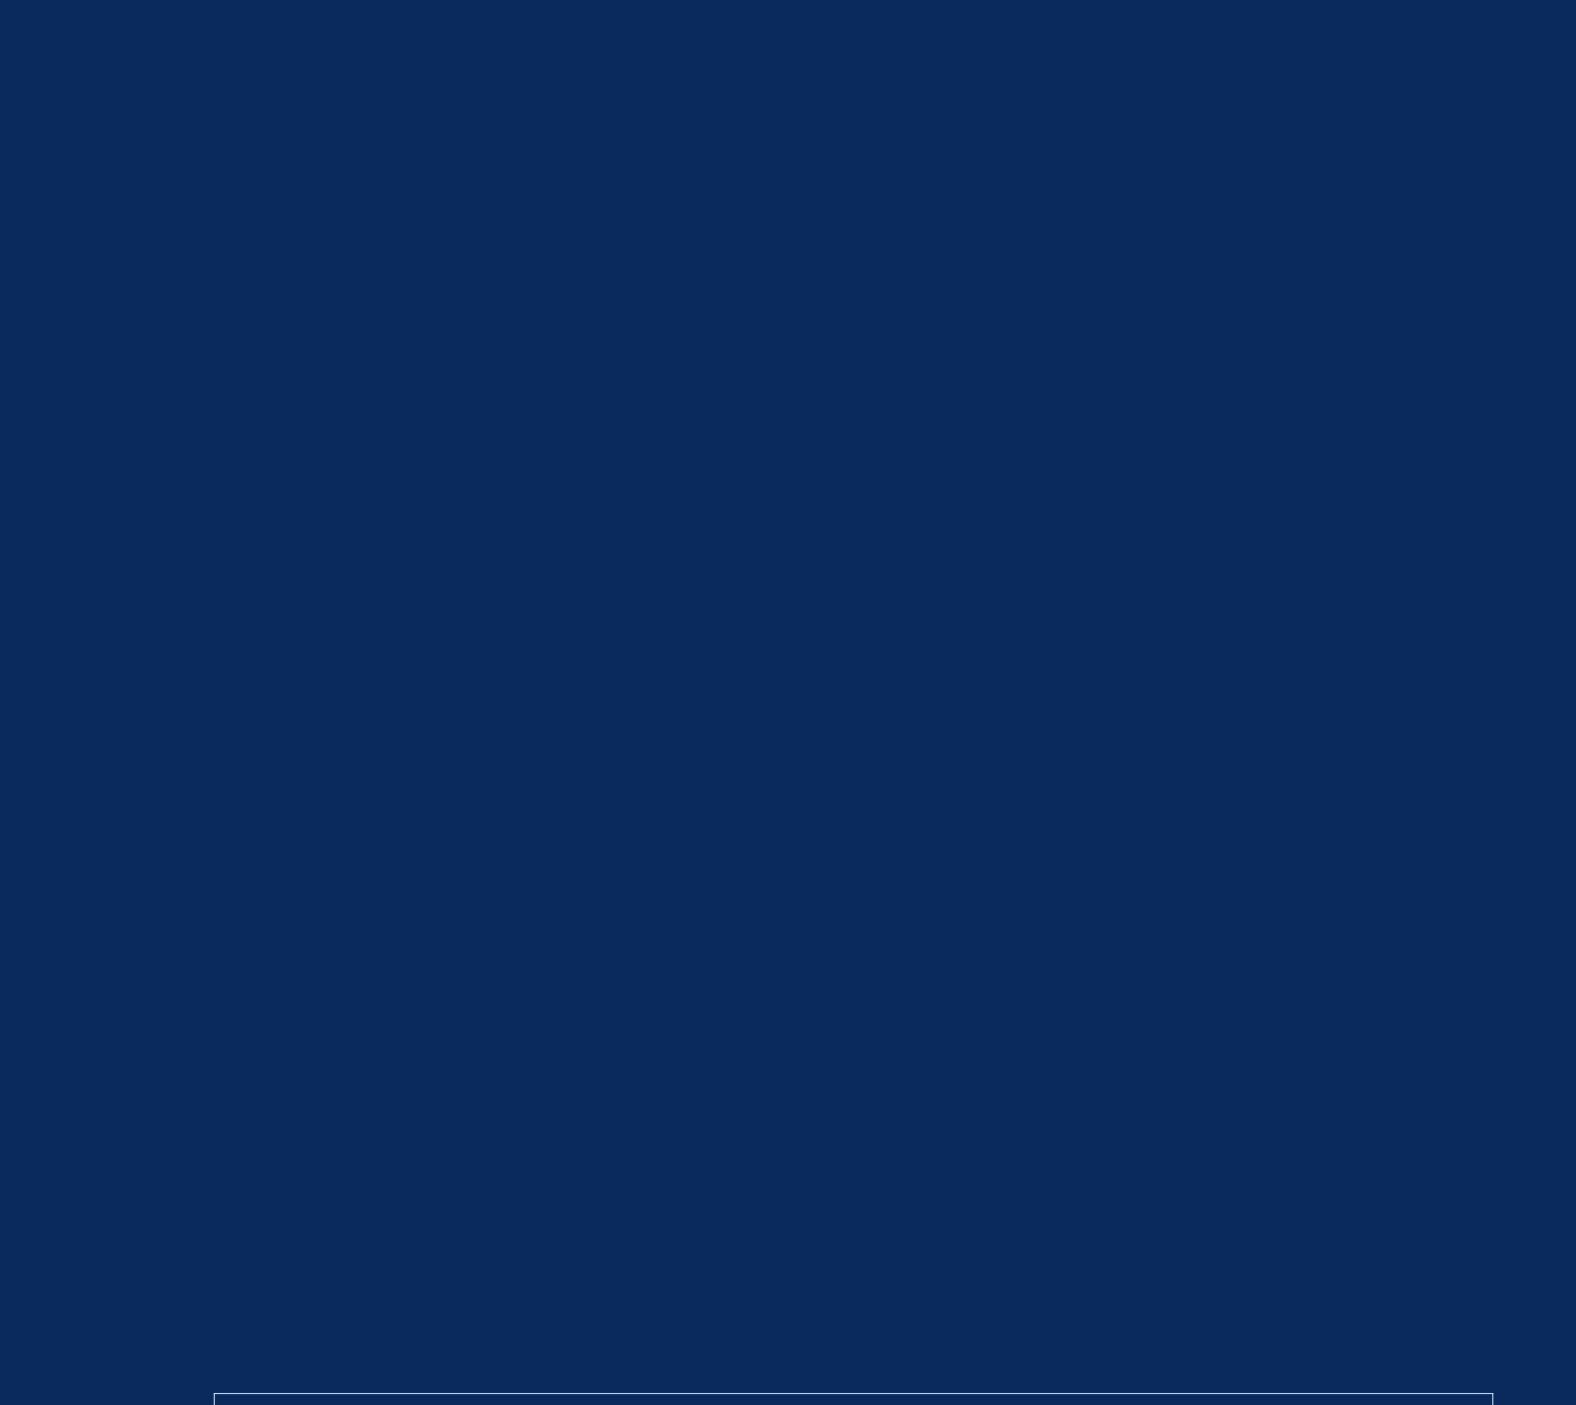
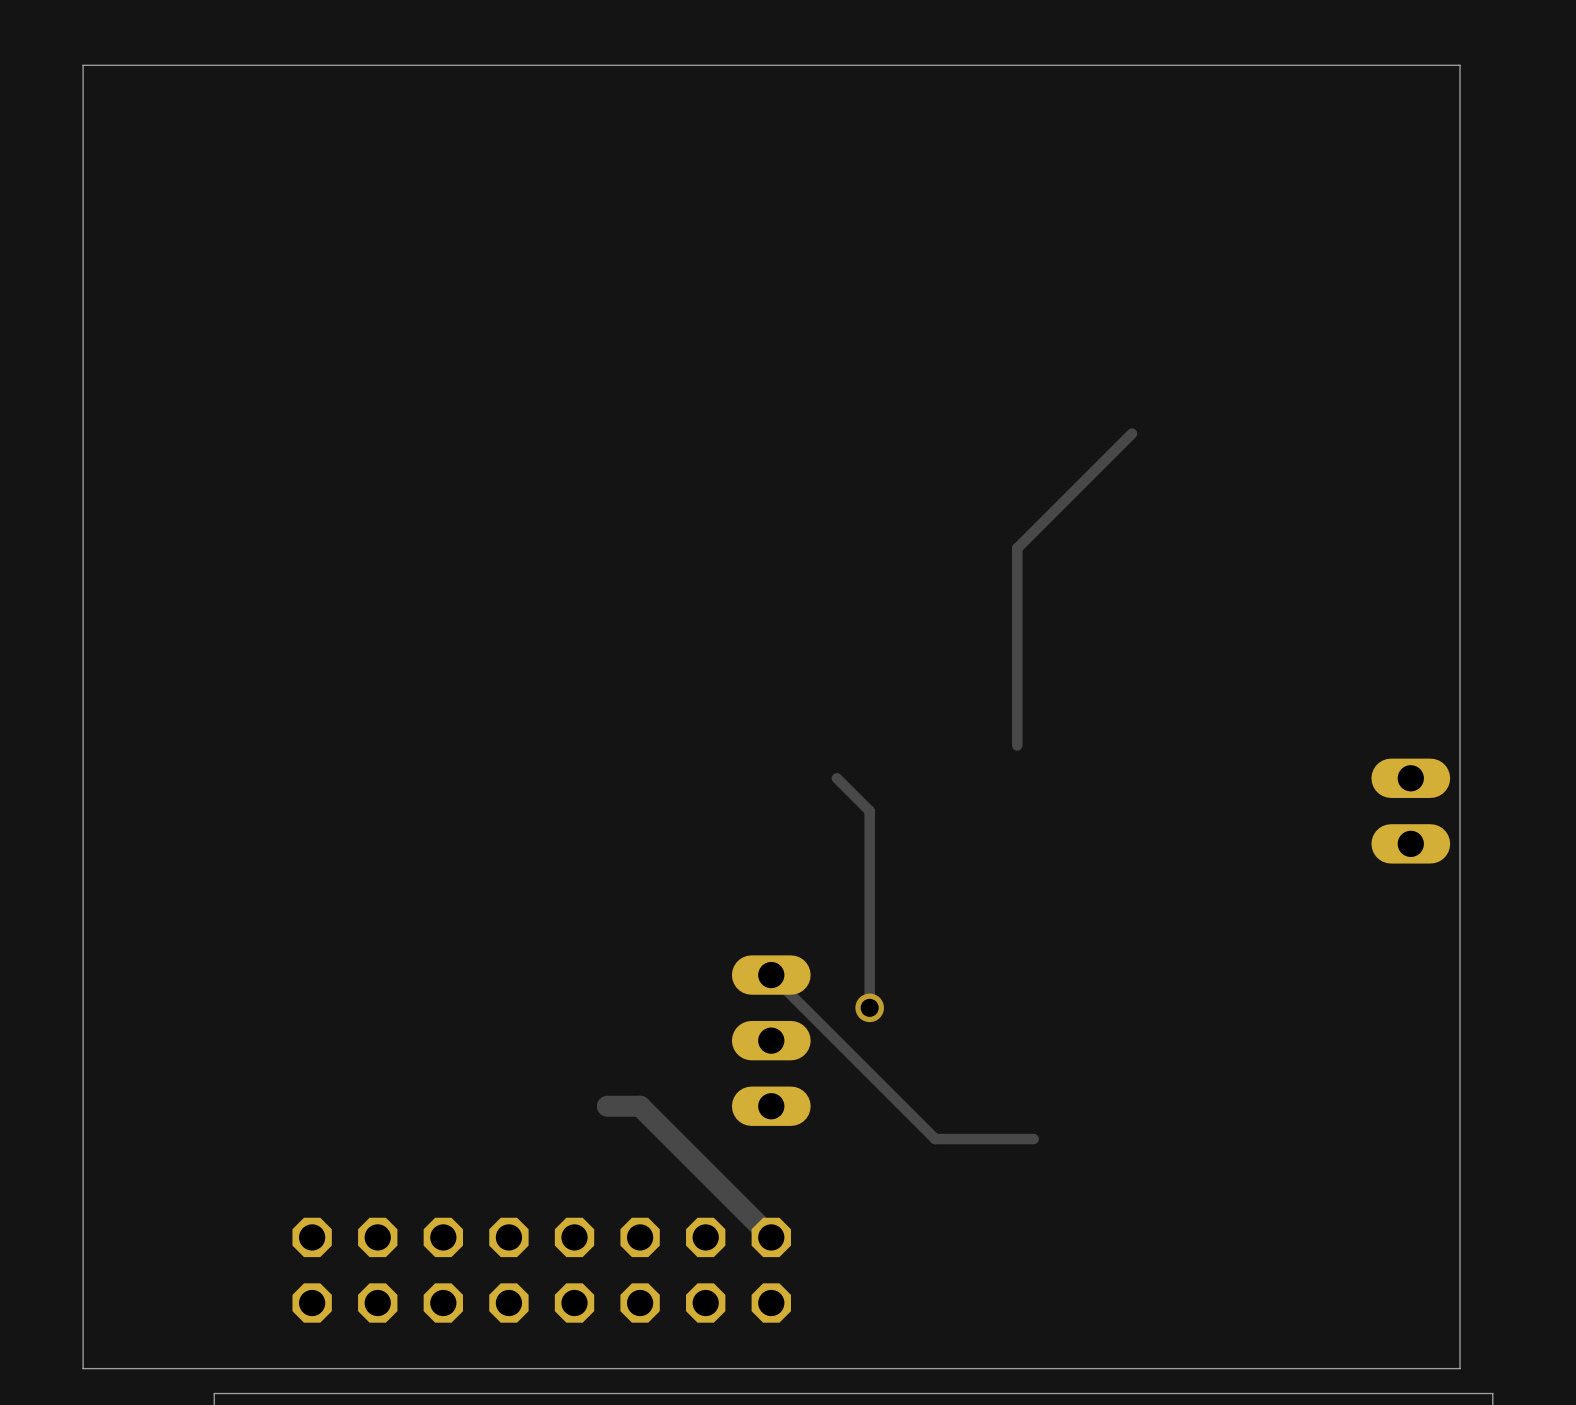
board edge: none -> (1460, 65) (83, 65) (83, 1368) (1460, 1368) (1460, 65)
track: none -> (1132, 433) (1017, 548) (1017, 745)
track: none -> (836, 778) (869, 811) (869, 1007)
part: none -> (1410, 811)
track: none -> (771, 975) (935, 1139) (1033, 1139)
via: none -> (869, 1007)
part: none -> (771, 1040)
track: none -> (607, 1106) (640, 1106) (771, 1237)
part: none -> (541, 1270)

